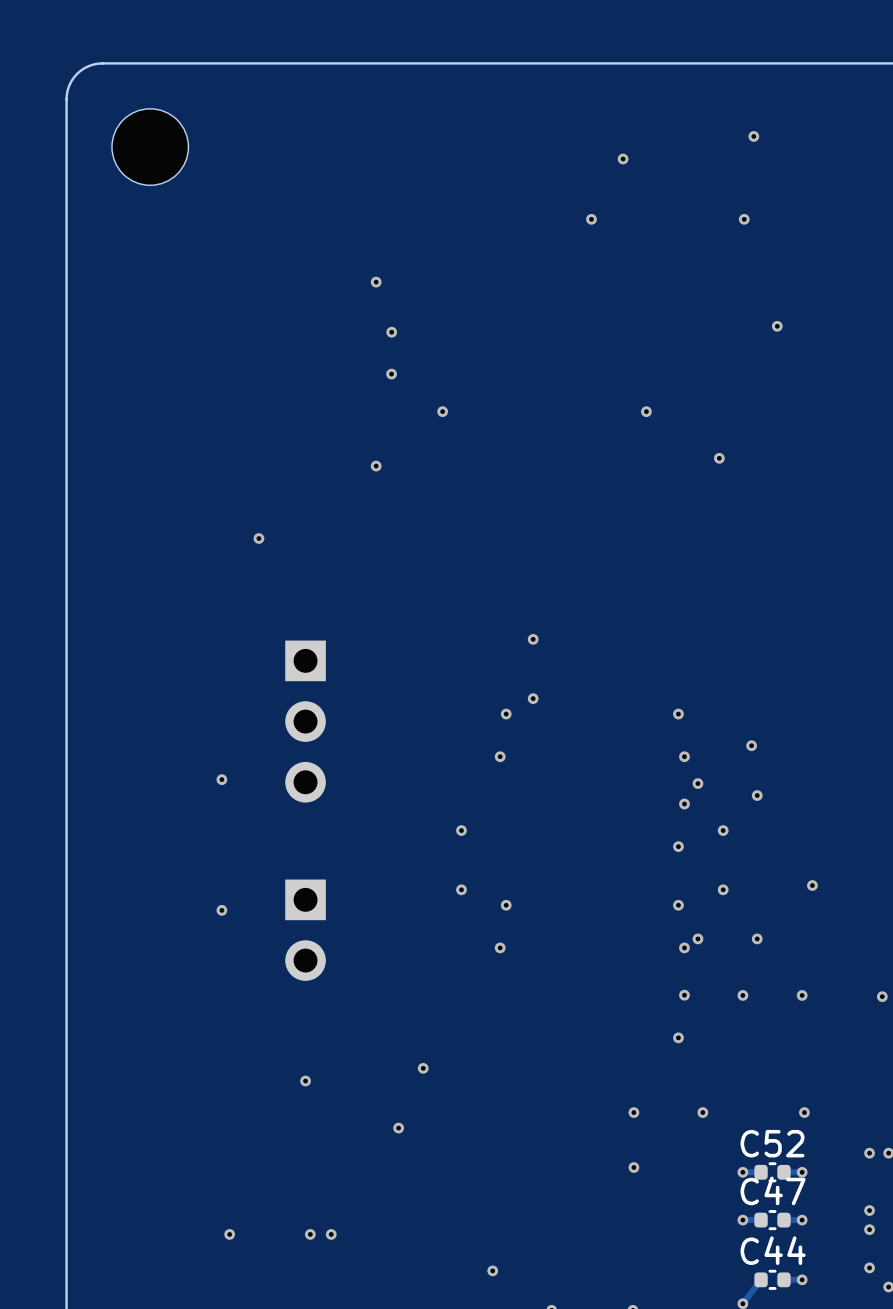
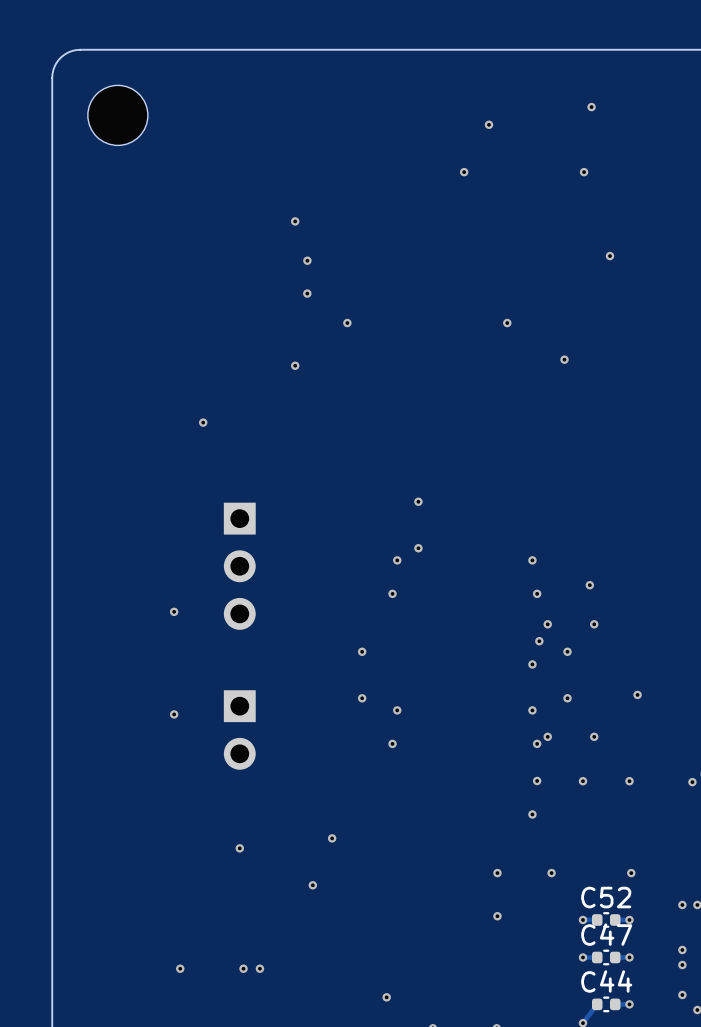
via: (697, 783) -> none
via: none -> (547, 624)
via: (684, 804) -> none
via: none -> (539, 641)

